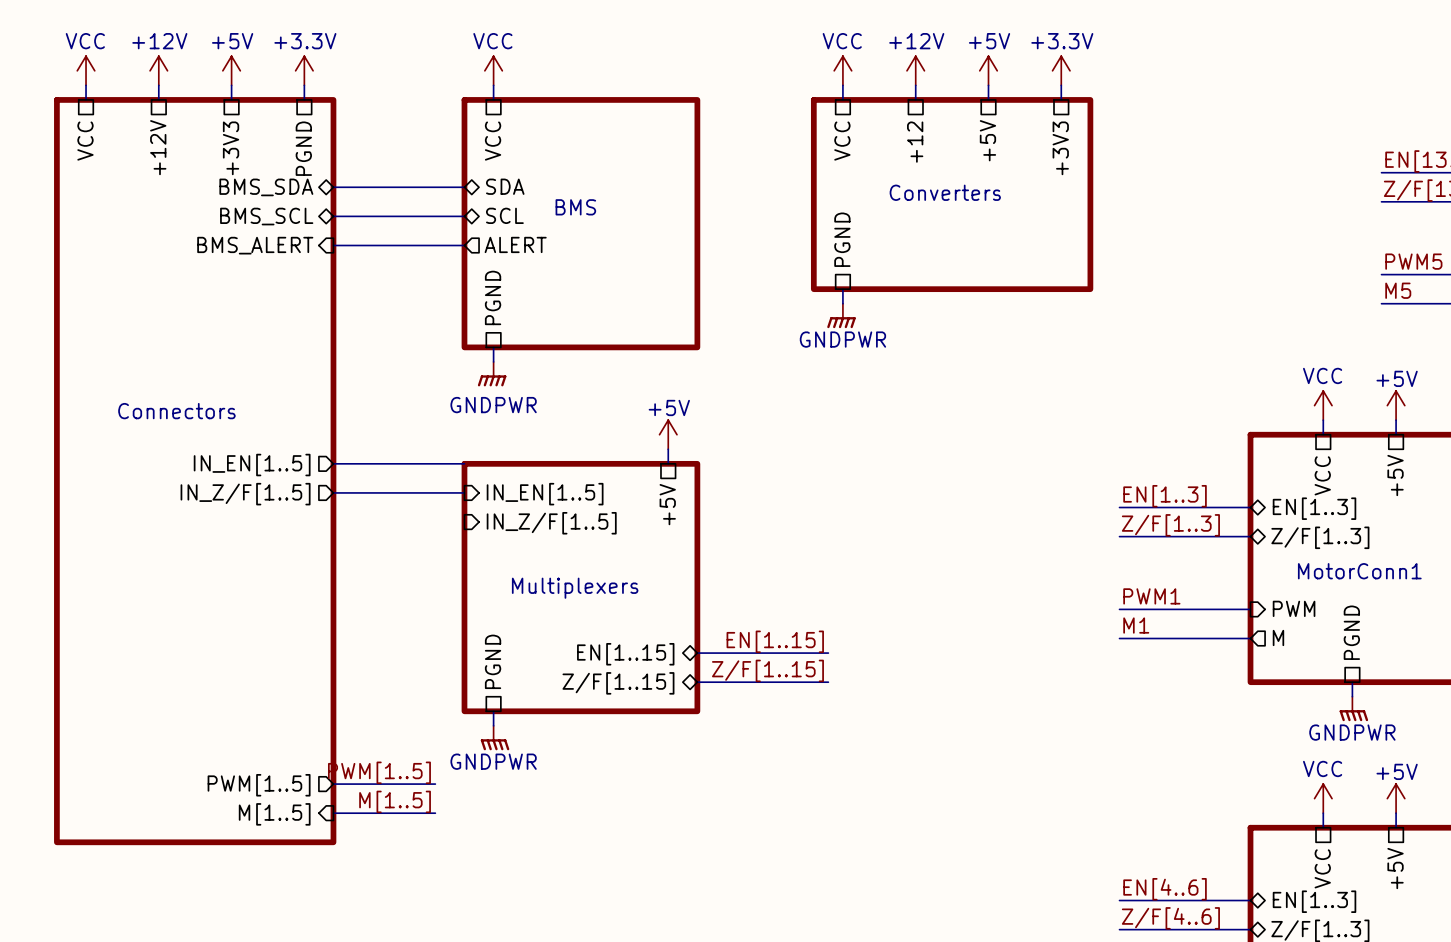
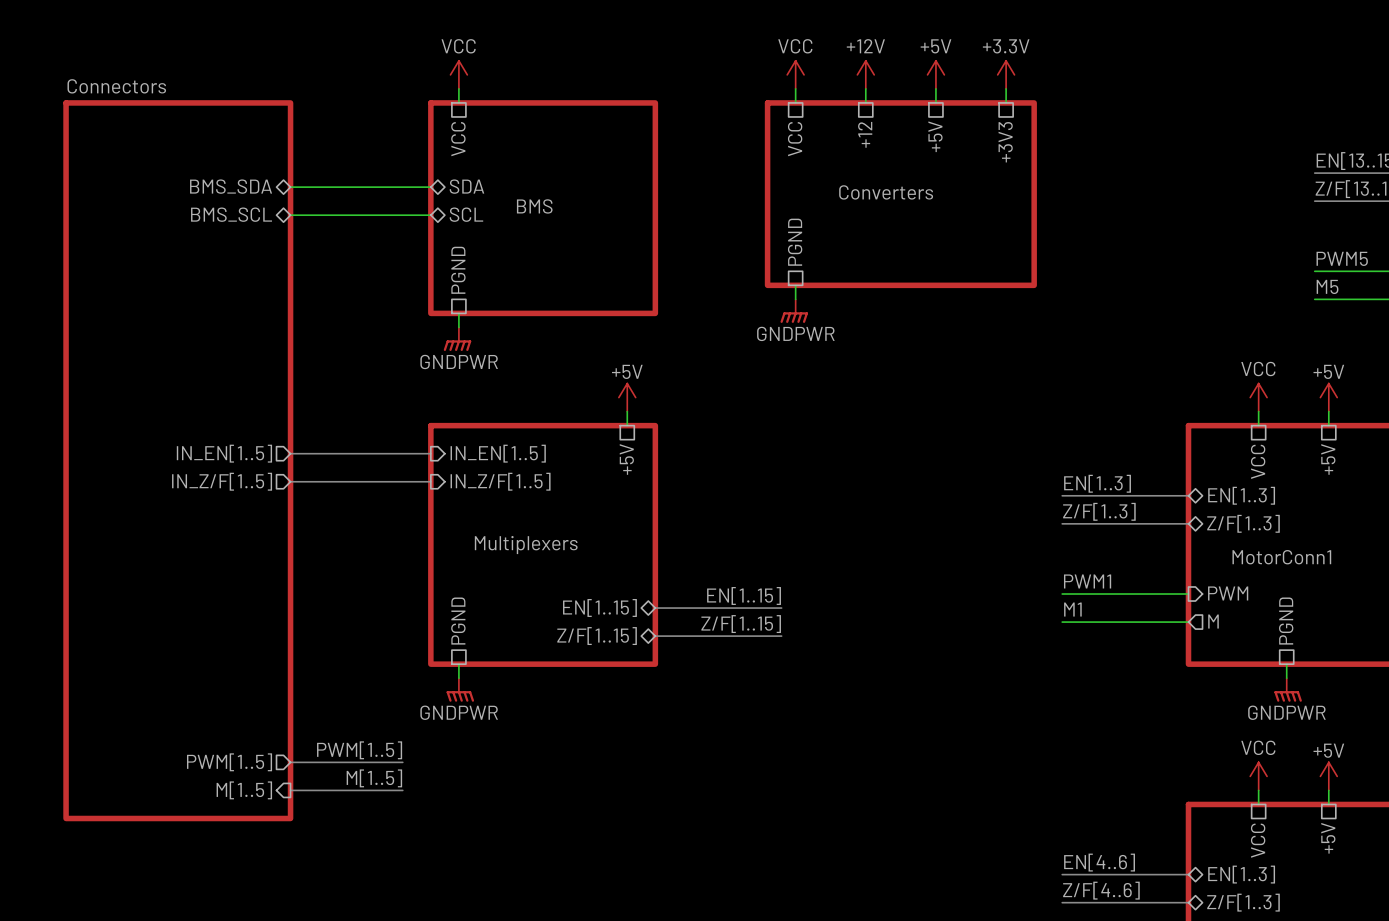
power symbol: VCC (86, 70) -> none
power symbol: +12V (158, 70) -> none
power symbol: +5V (231, 70) -> none
power symbol: +3.3V (304, 70) -> none
wire: (86, 85) (86, 99) -> none
wire: (158, 85) (158, 99) -> none
wire: (231, 85) (231, 99) -> none
wire: (304, 85) (304, 99) -> none
sheet Connectors shape: [54, 97, 337, 846] -> [63, 100, 294, 822]
sheet pin: VCC (85, 141) -> none
sheet pin: +12V (158, 147) -> none
sheet pin: +3V3 (231, 148) -> none
sheet pin: PGND (303, 148) -> none
sheet pin position: BMS_SDA (266, 187) -> BMS_SDA (231, 186)
wire: none -> (290, 187) (304, 187)
sheet BMS: none -> (543, 208)
sheet pin position: BMS_SCL (266, 216) -> BMS_SCL (231, 214)
wire: none -> (290, 215) (304, 215)
sheet BMS: (580, 223) -> none
sheet pin: ALERT (515, 244) -> none
sheet pin: BMS_ALERT (255, 245) -> none
wire: (333, 245) (464, 245) -> none
sheet pin position: PGND (493, 297) -> PGND (458, 270)
wire: (493, 347) (493, 361) -> (458, 313) (458, 327)
power symbol position: GNDPWR (492, 374) -> GNDPWR (457, 339)
power symbol text position: GNDPWR (493, 405) -> GNDPWR (459, 361)
sheet Connectors name position: Connectors (176, 411) -> Connectors (116, 86)
power symbol position: +5V (668, 434) -> +5V (627, 397)
bus: none -> (290, 453) (304, 453)
sheet pin position: IN_EN[1..5] (252, 465) -> IN_EN[1..5] (224, 453)
sheet pin: none -> IN_EN[1..5] (498, 453)
bus: none -> (290, 481) (304, 481)
sheet pin position: IN_Z/F[1..5] (245, 494) -> IN_Z/F[1..5] (222, 481)
sheet pin: IN_EN[1..5] (545, 494) -> IN_Z/F[1..5] (500, 481)
sheet pin position: +5V (667, 504) -> +5V (626, 459)
sheet pin: IN_Z/F[1..5] (551, 523) -> none
sheet Multiplexers position: (580, 587) -> (543, 544)
label: none -> EN[1..15] (744, 595)
sheet pin: none -> EN[1..15] (599, 607)
label: EN[1..15] (775, 641) -> Z/F[1..15] (741, 624)
sheet pin: EN[1..15] (625, 654) -> Z/F[1..15] (597, 636)
sheet pin position: PGND (493, 661) -> PGND (458, 621)
label: Z/F[1..15] (767, 670) -> none
bus: (697, 682) (828, 682) -> (655, 608) (781, 608)
sheet pin: Z/F[1..15] (618, 683) -> none
wire: (493, 711) (493, 725) -> (458, 664) (458, 678)
power symbol position: GNDPWR (495, 738) -> GNDPWR (460, 689)
bus: none -> (290, 762) (304, 762)
sheet pin position: PWM[1..5] (259, 785) -> PWM[1..5] (229, 762)
bus: none -> (290, 790) (304, 790)
sheet pin position: M[1..5] (274, 814) -> M[1..5] (244, 790)

